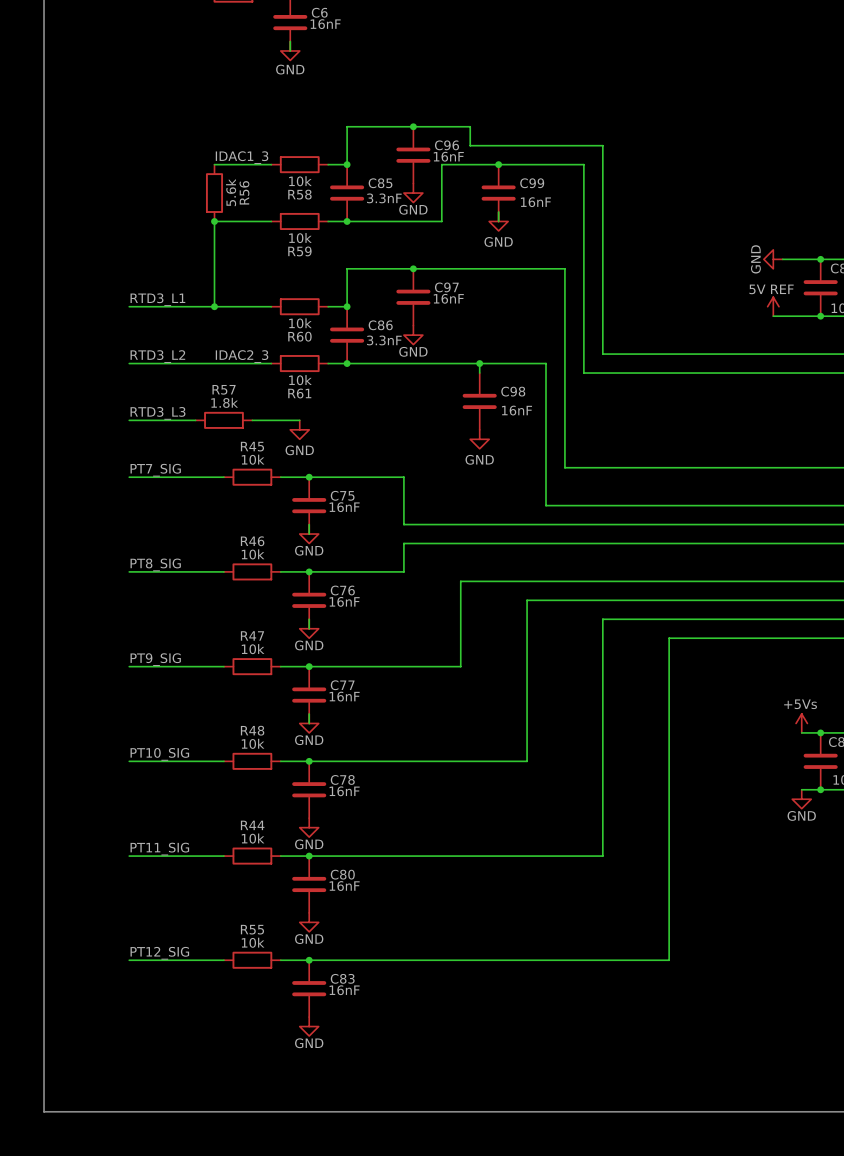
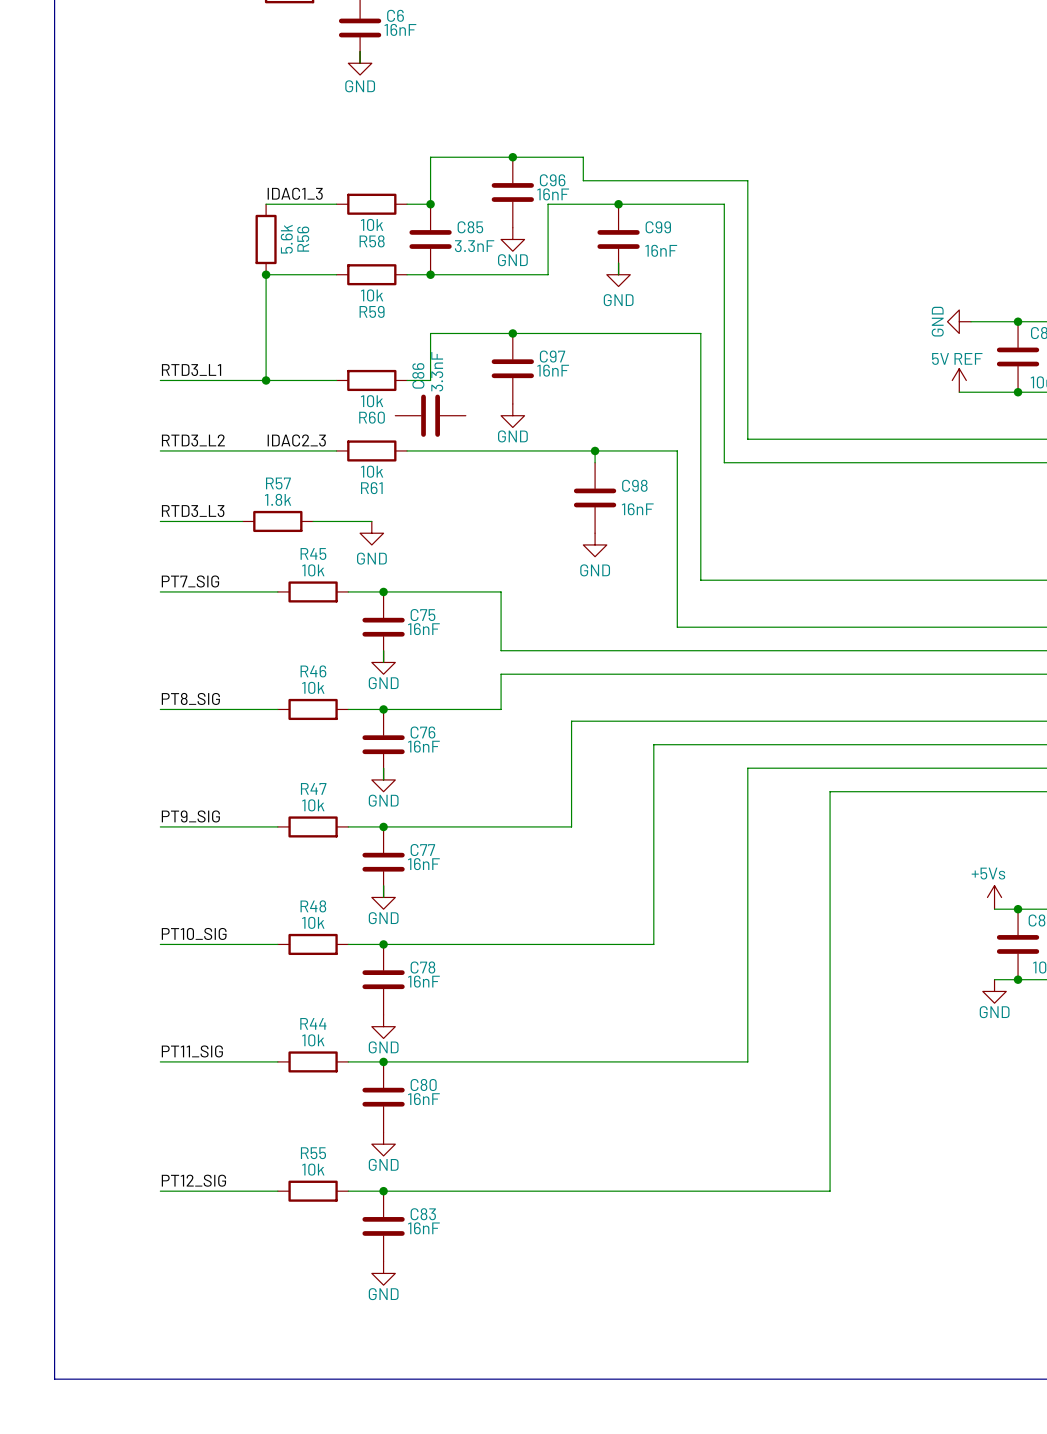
junction: (347, 306) -> none
C86 name position: C86 (380, 325) -> C86 (418, 375)
C86 rotation: 0° (347, 335) -> 90° clockwise (430, 415)
C86 value position: 3.3nF (384, 340) -> 3.3nF (437, 371)
junction: (347, 363) -> none

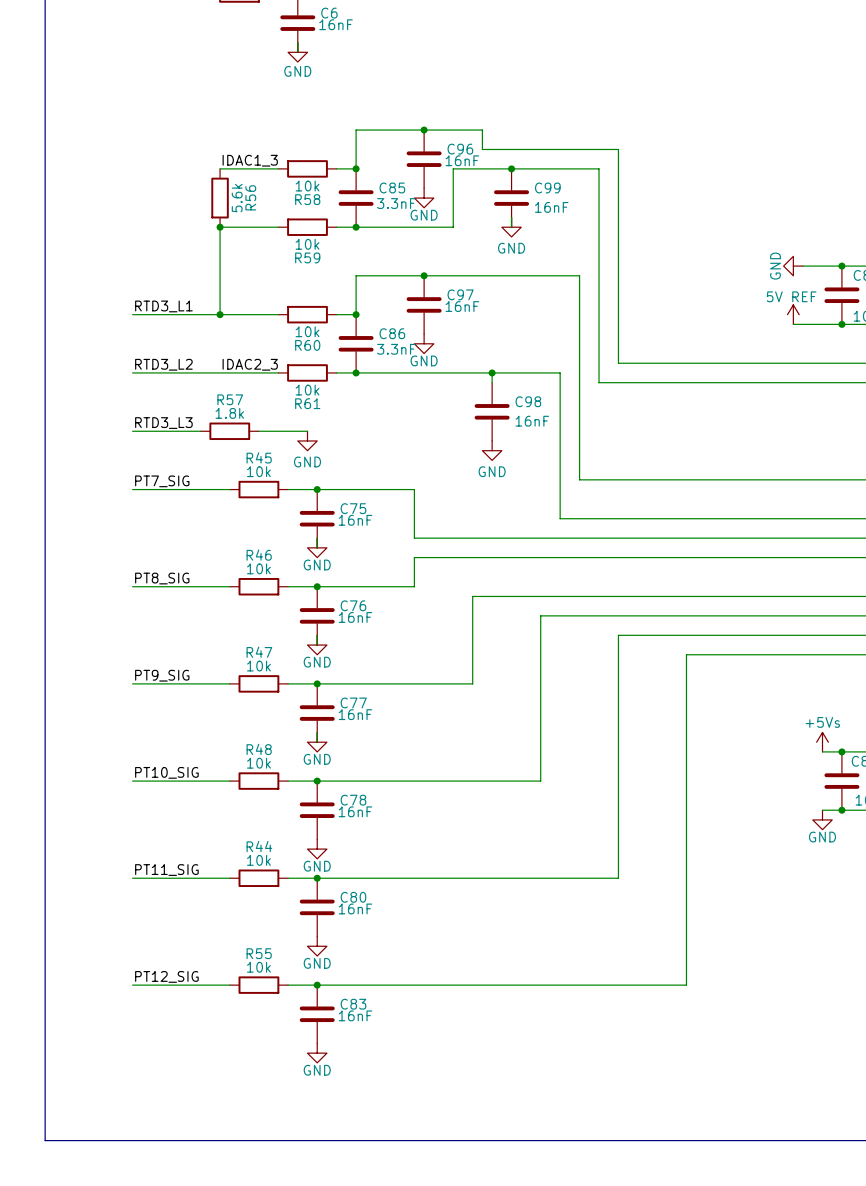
junction: none -> (356, 314)
C86 rotation: 0° (430, 415) -> 90° clockwise (356, 343)
junction: none -> (356, 372)

